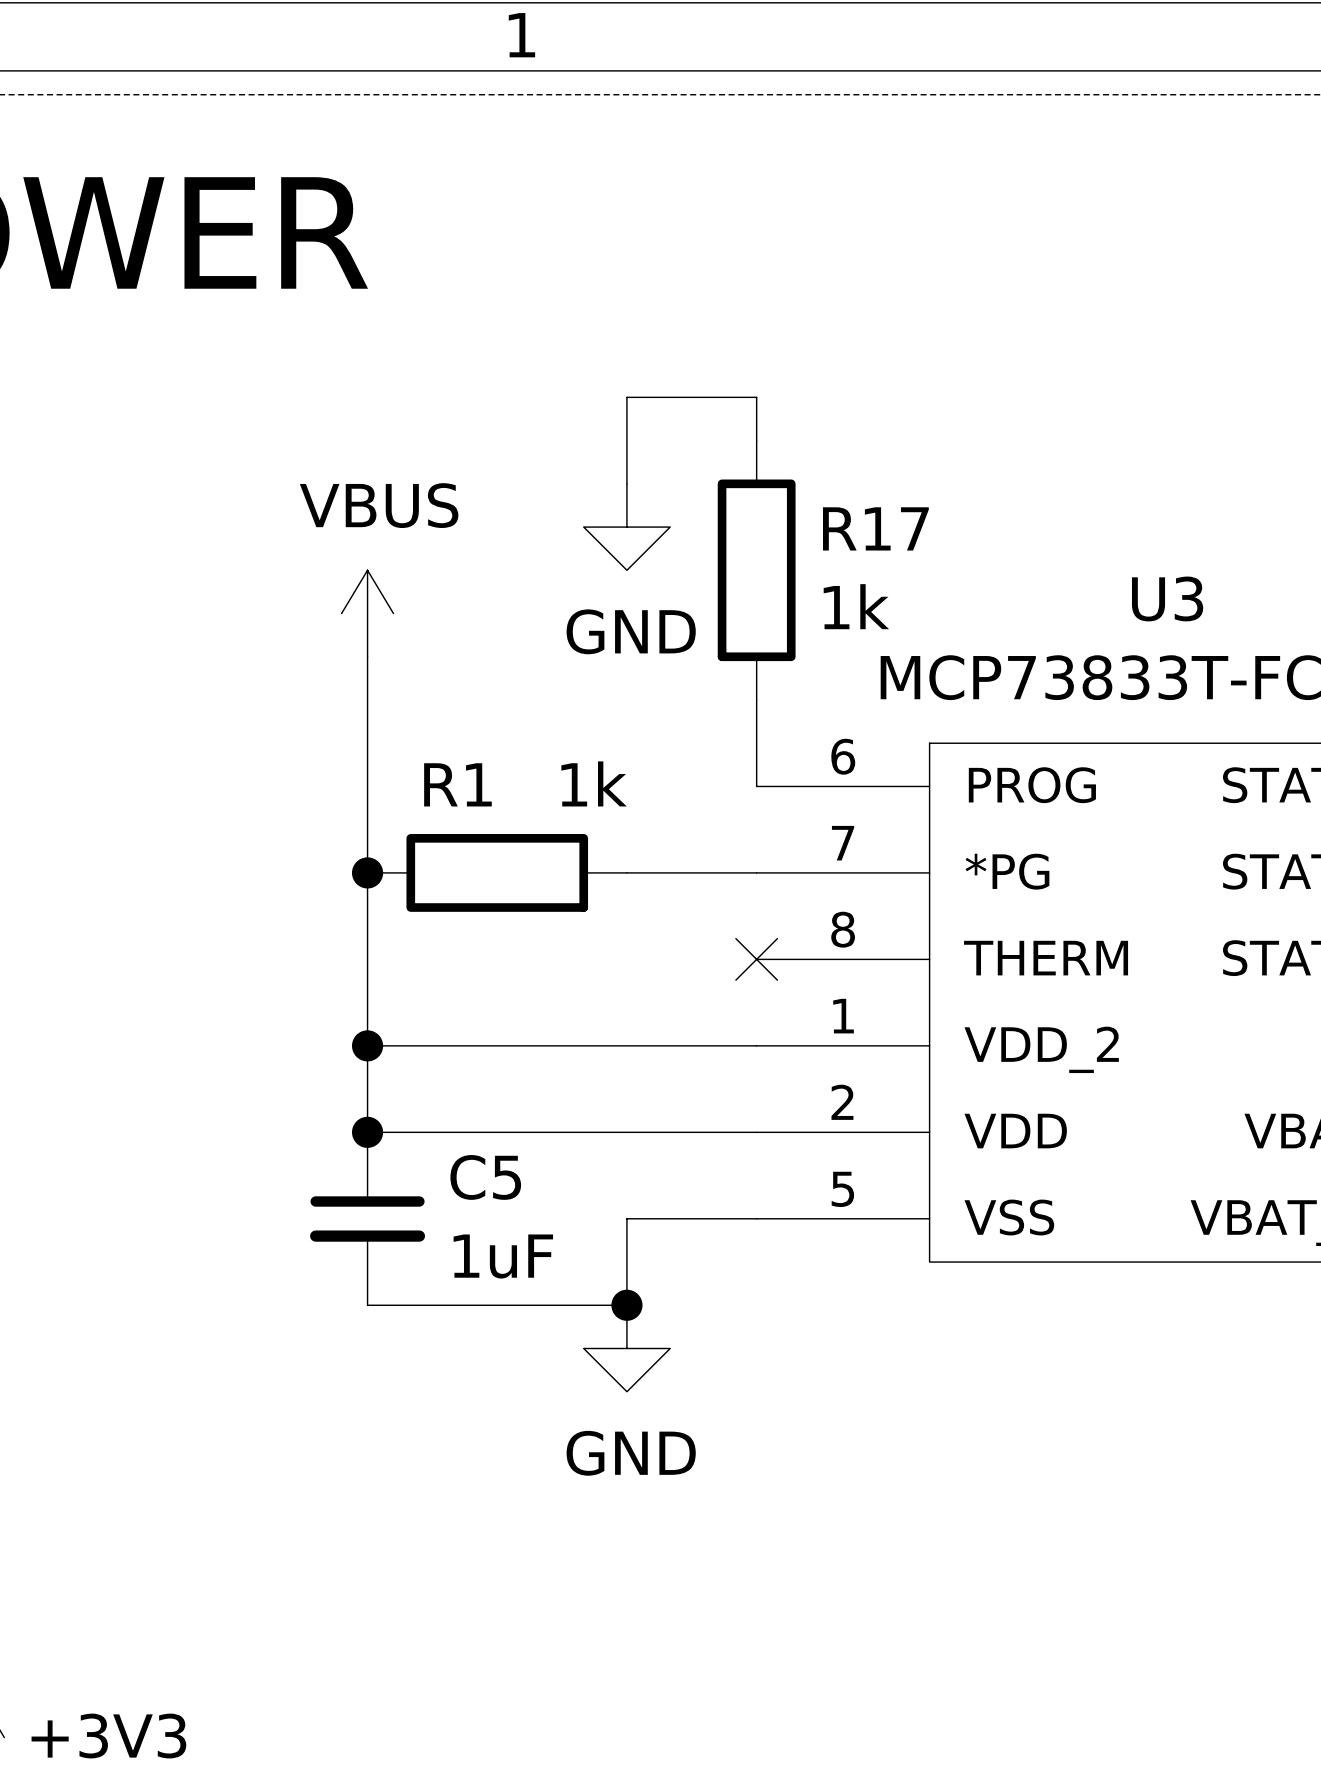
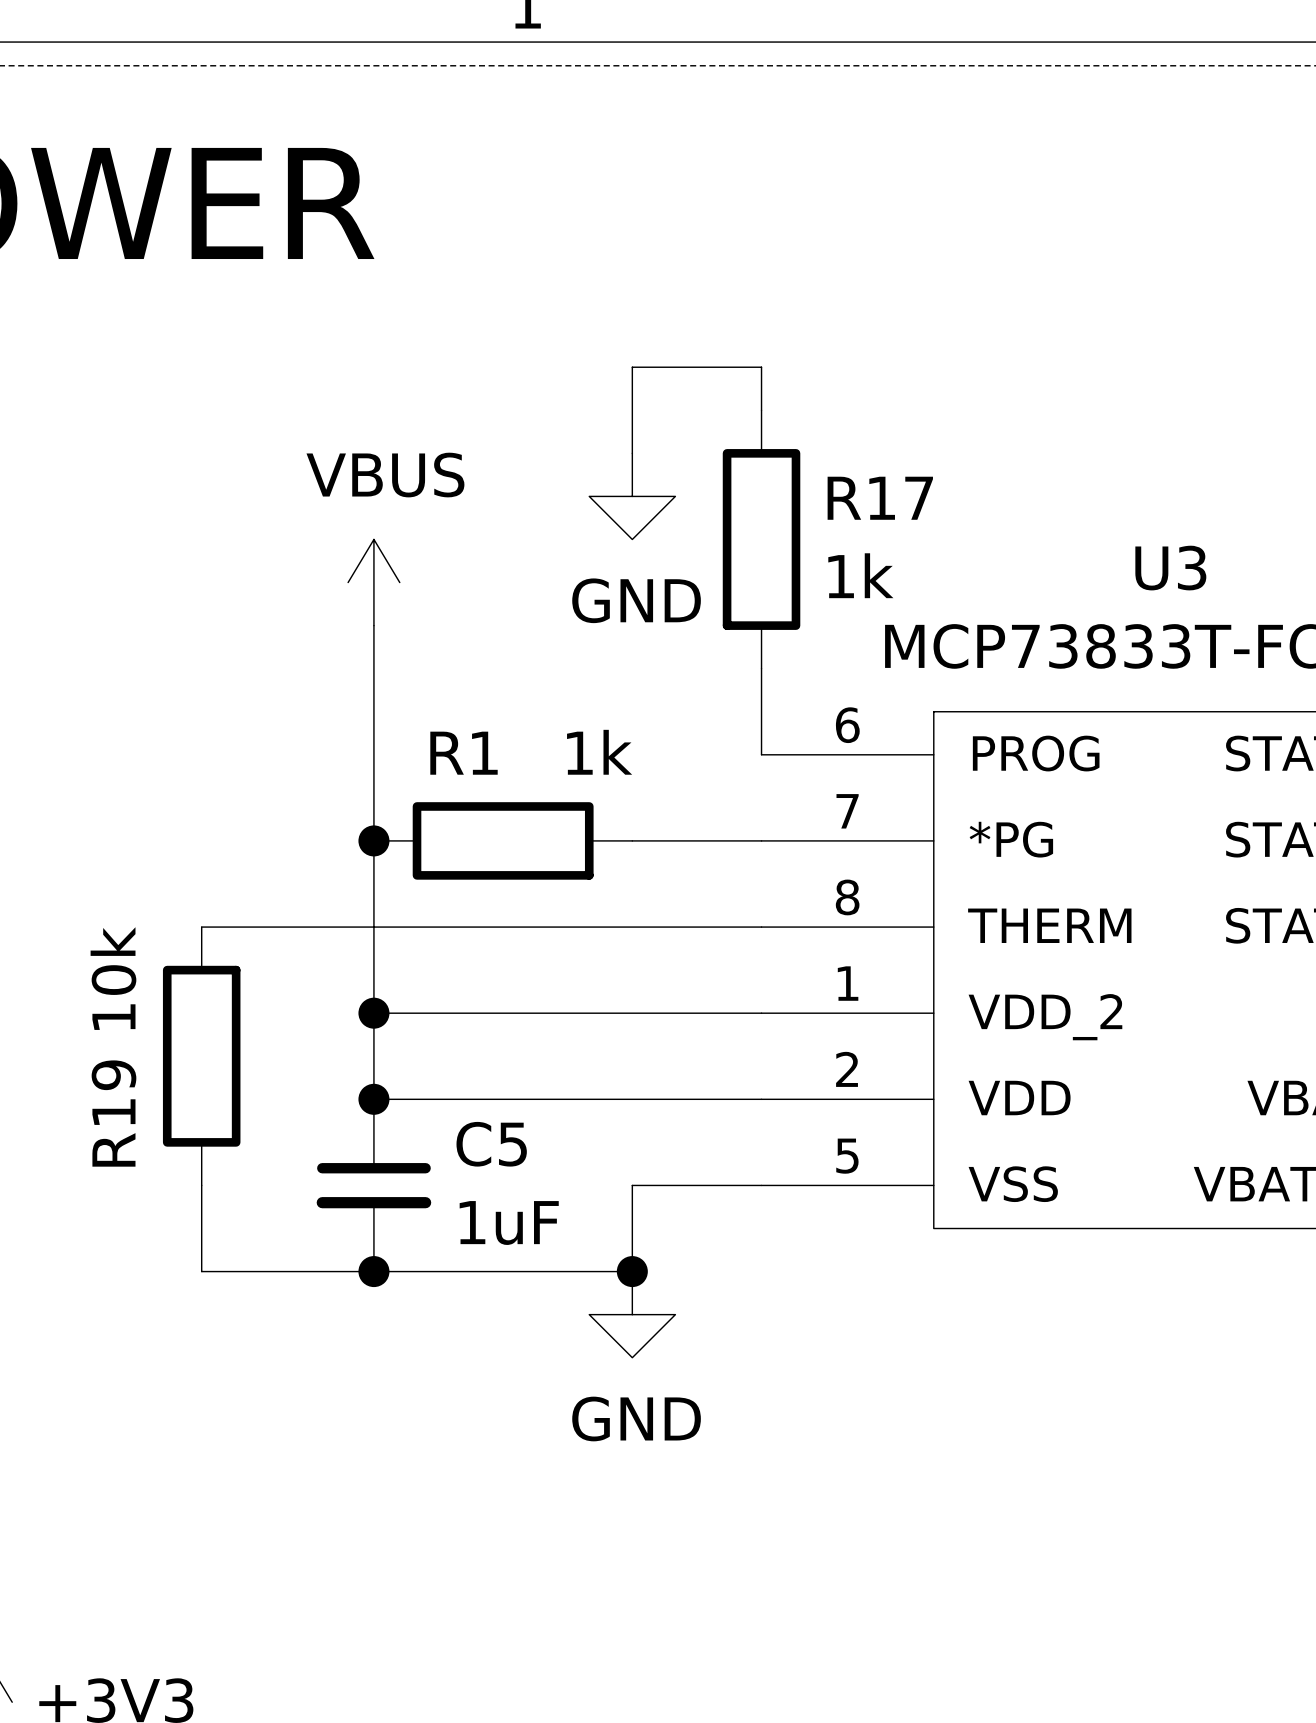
wire: none -> (201, 927) (761, 927)
no-connect mark: (756, 959) -> none
R19: none -> 10k (201, 1056)
wire: none -> (201, 1185) (201, 1271) (373, 1271)
junction: none -> (373, 1271)

